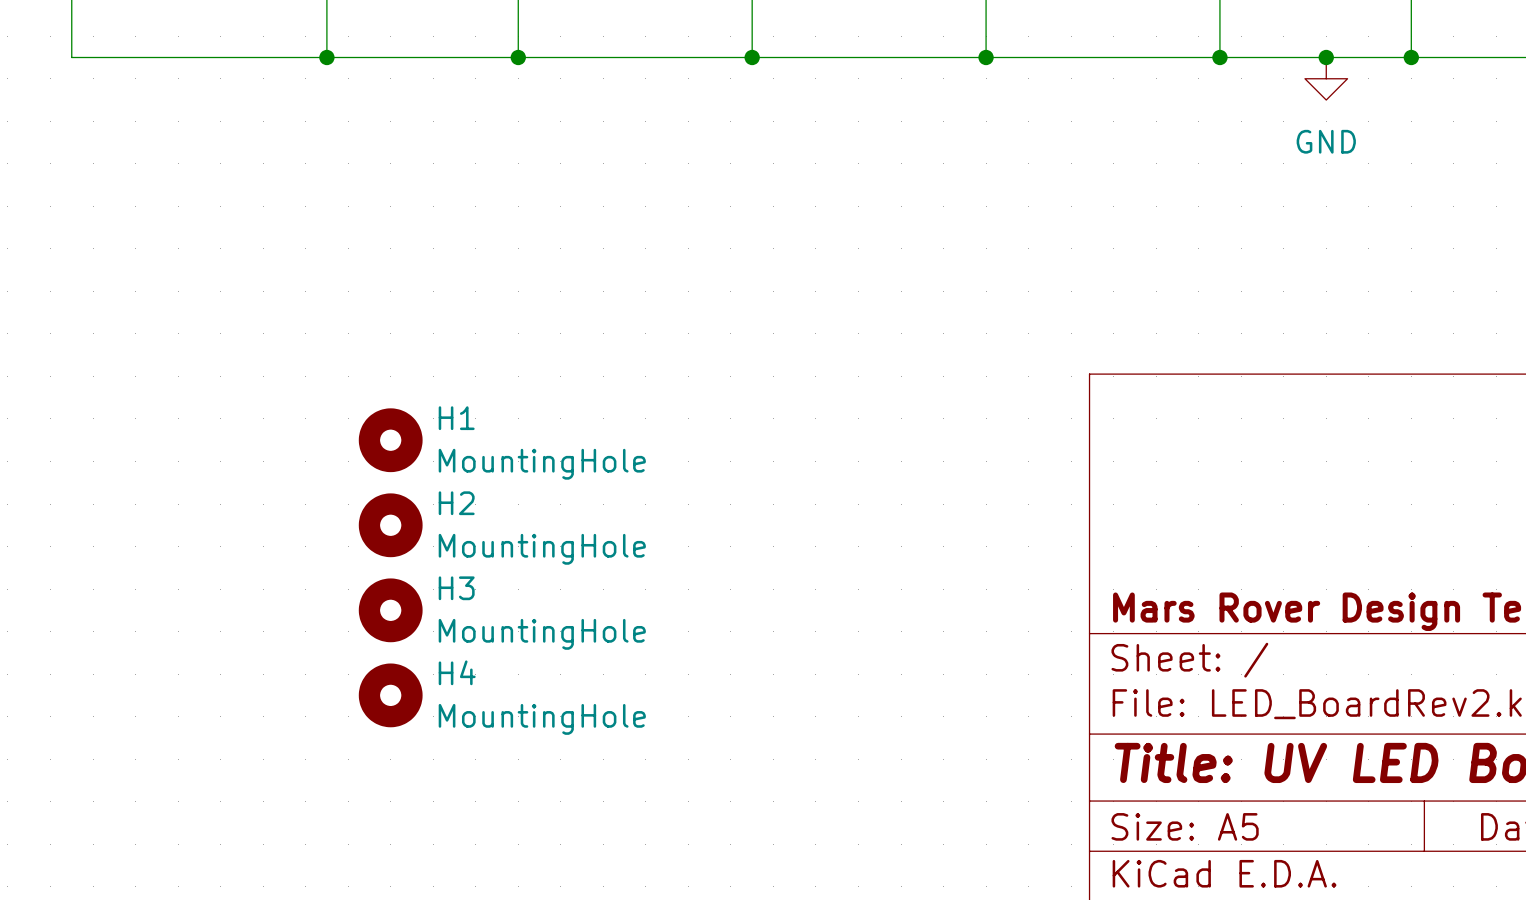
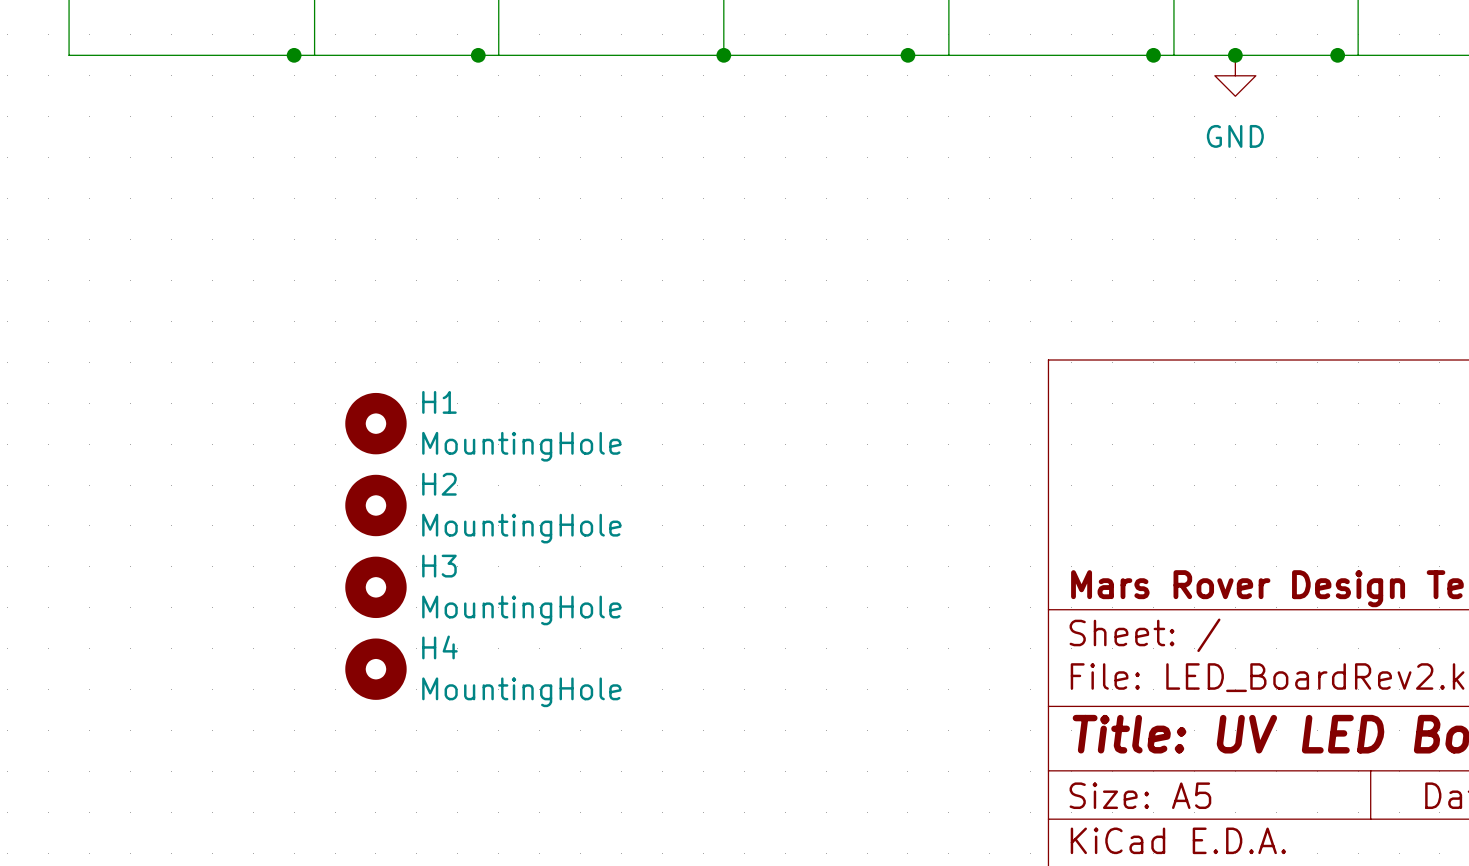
junction position: (326, 57) -> (294, 55)
junction position: (518, 57) -> (478, 55)
junction position: (986, 57) -> (907, 55)
junction position: (1219, 57) -> (1153, 55)
junction: none -> (1235, 55)
junction: (1326, 57) -> none
junction position: (1411, 57) -> (1337, 55)
power symbol position: GND (1326, 78) -> GND (1235, 75)

